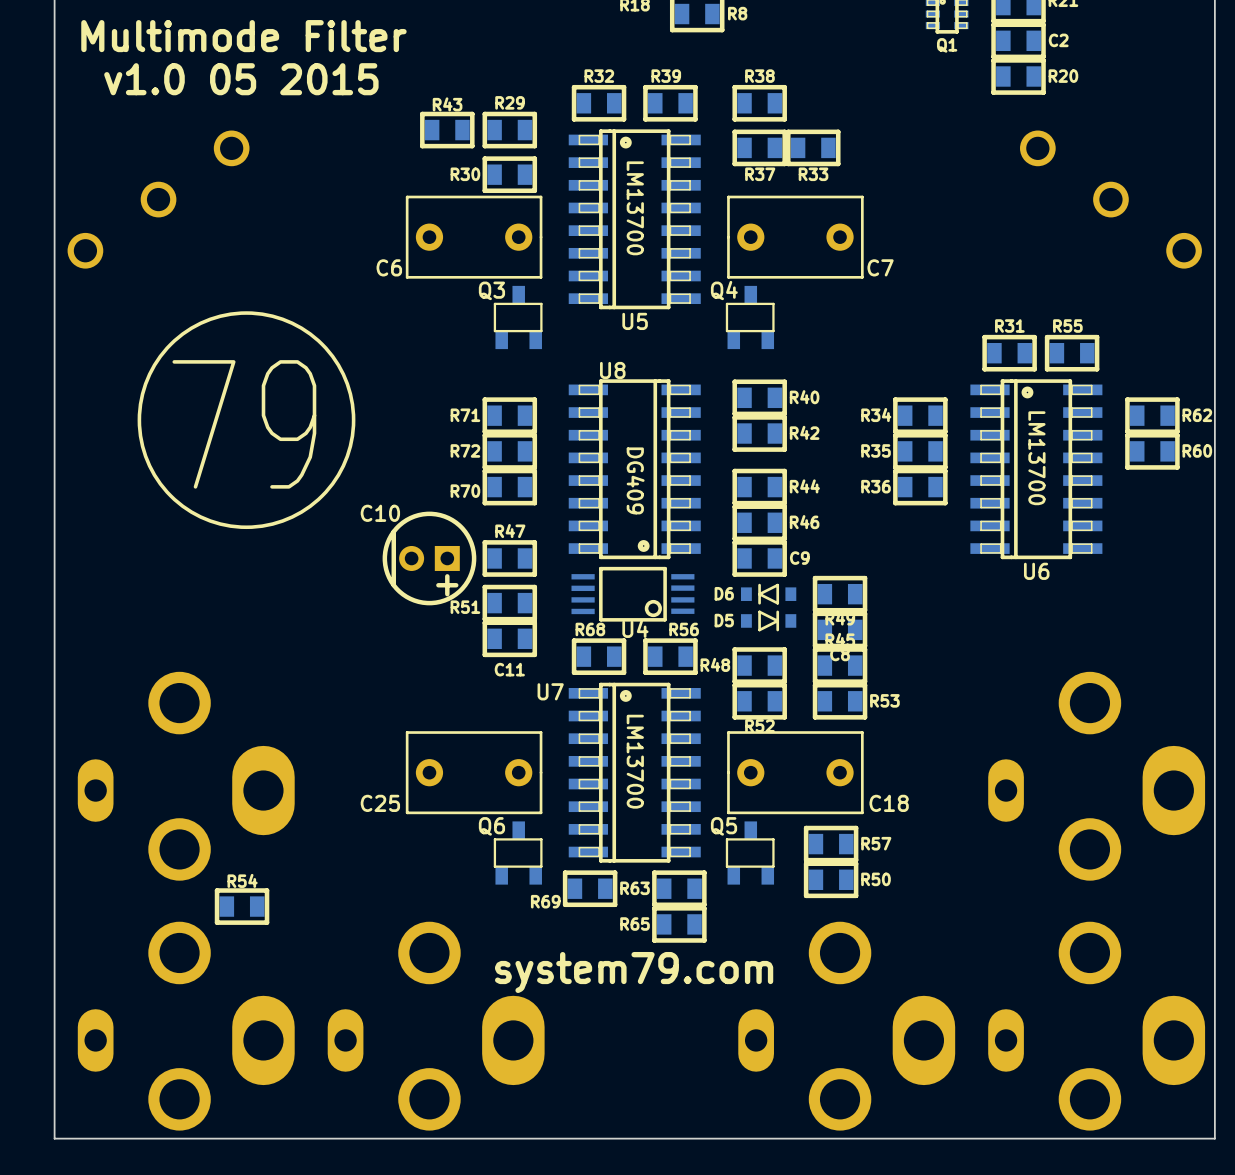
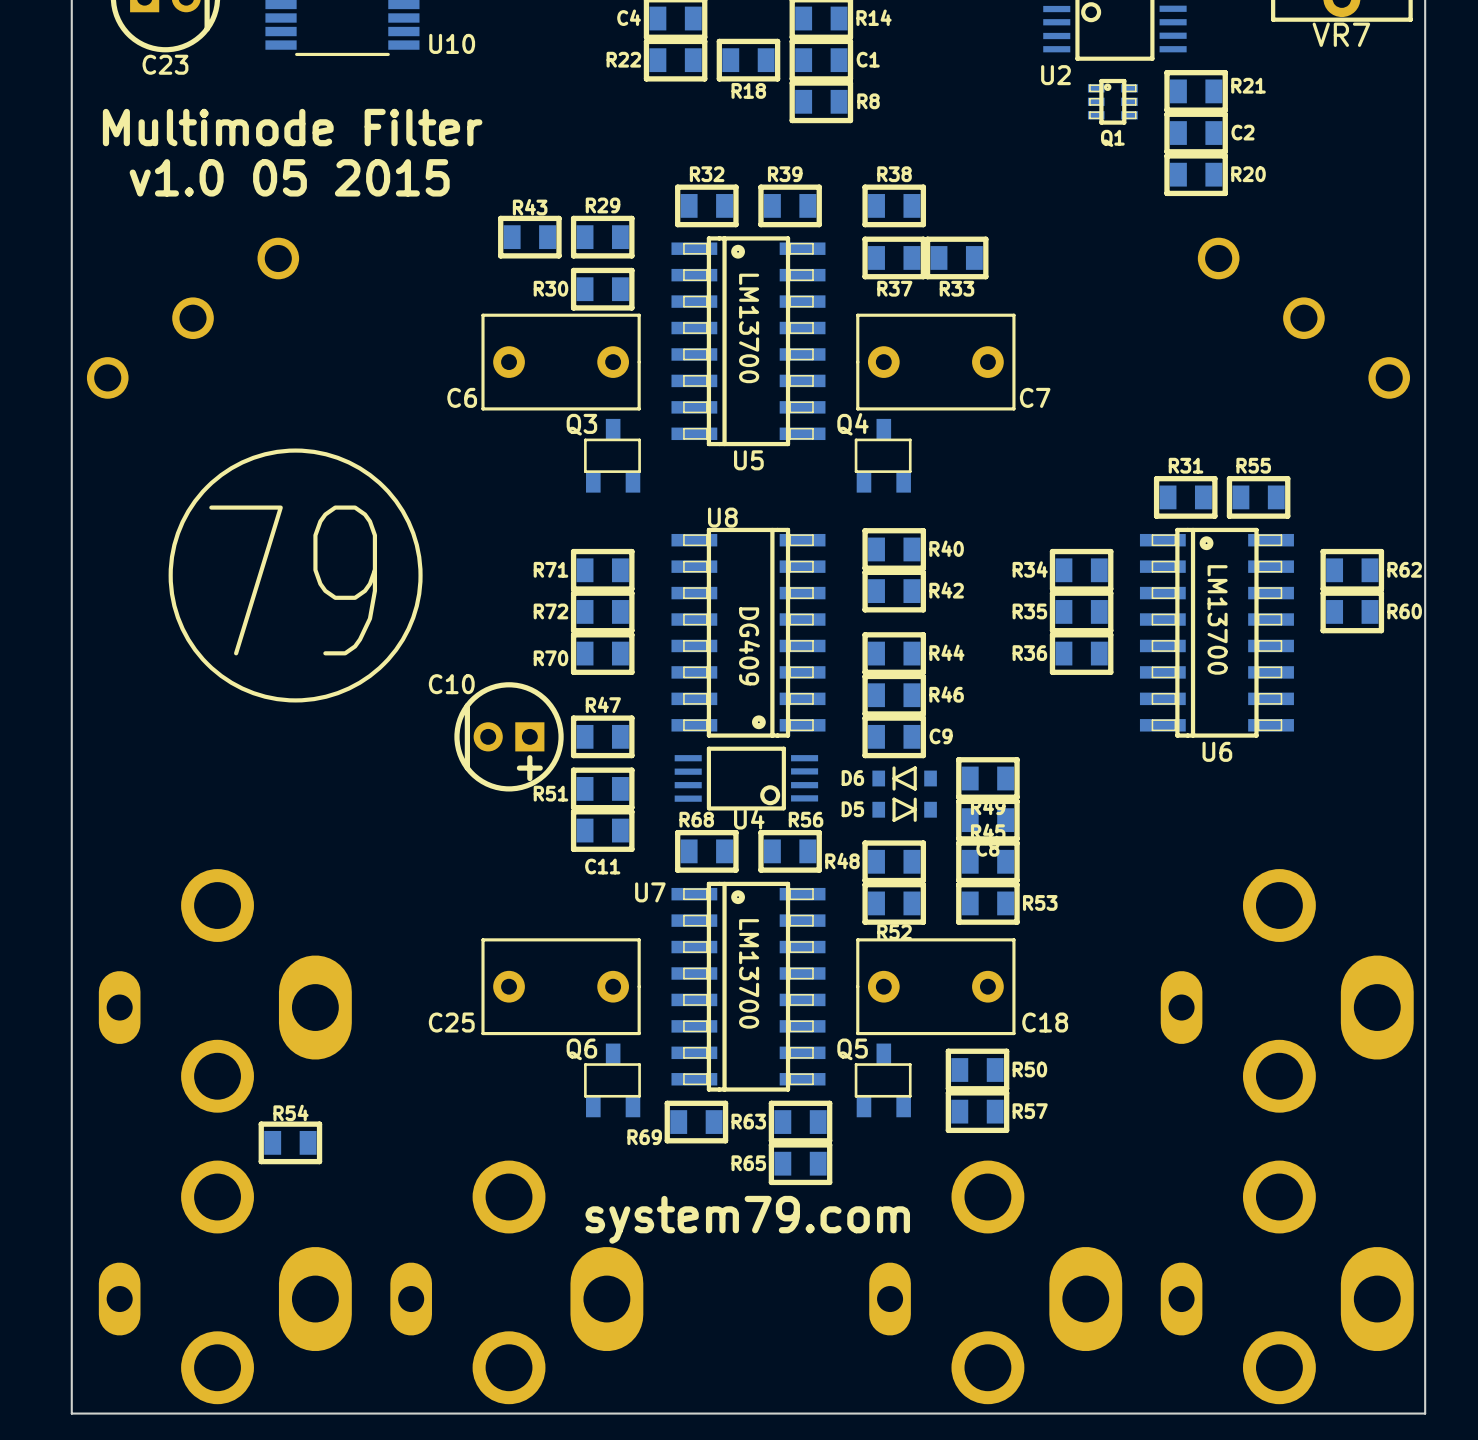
R57 name position: R57 (876, 843) -> R57 (1030, 1111)
R50 name position: R50 (875, 879) -> R50 (1029, 1069)

